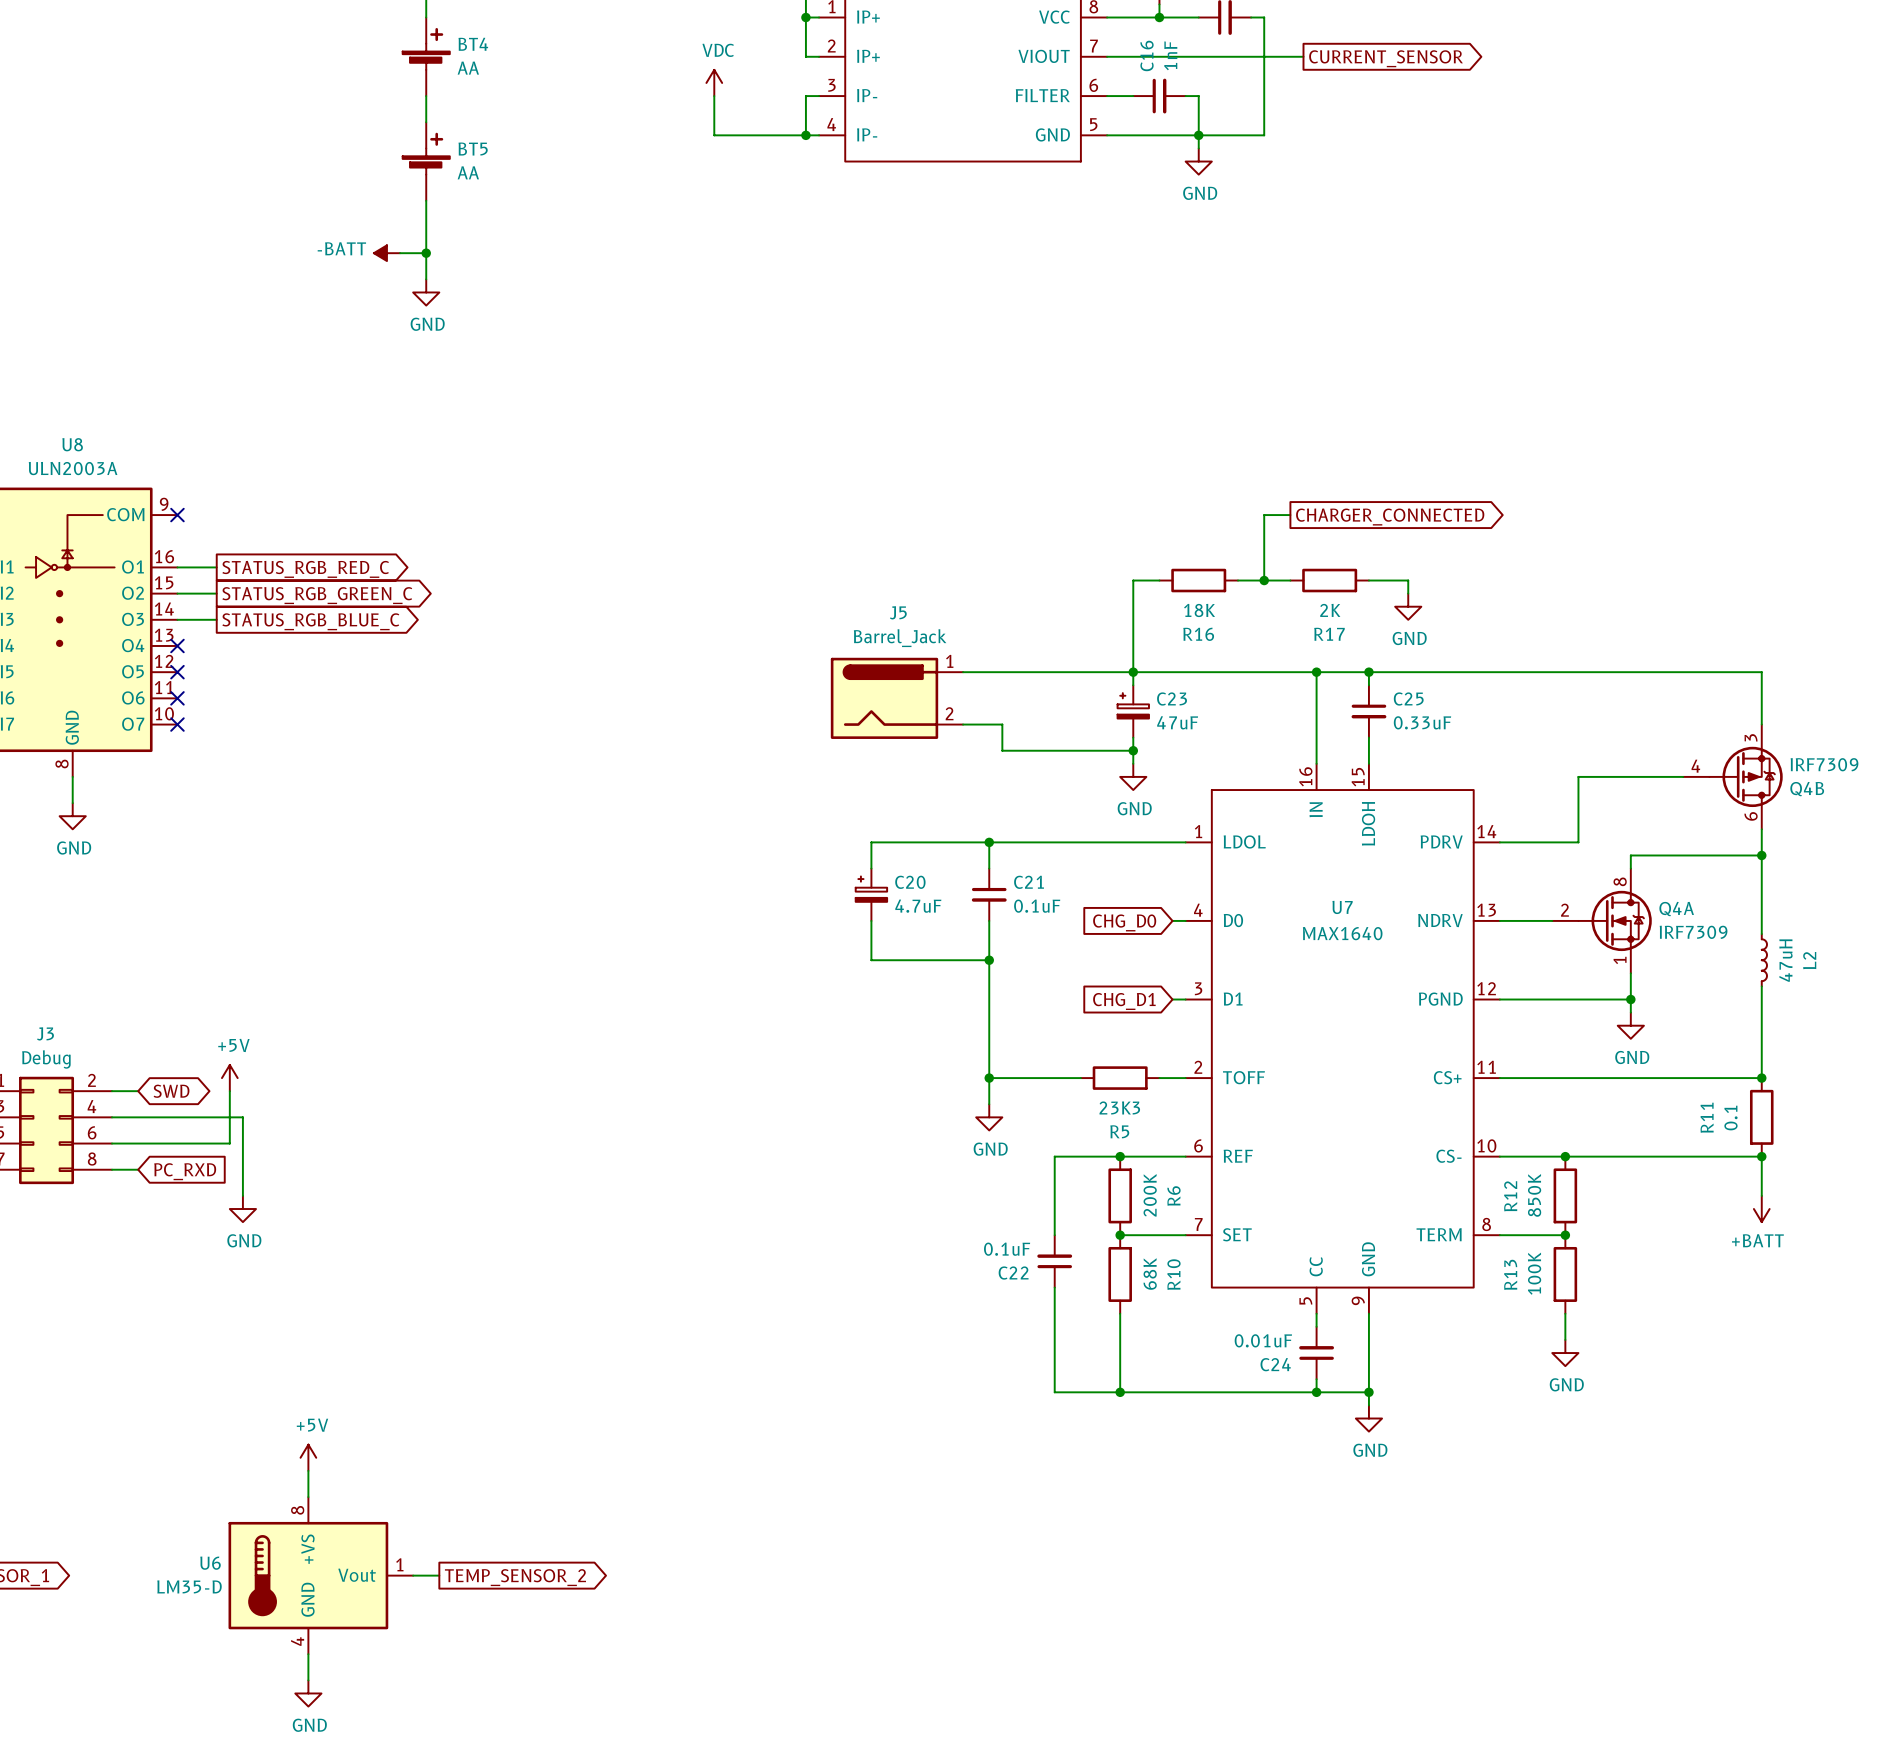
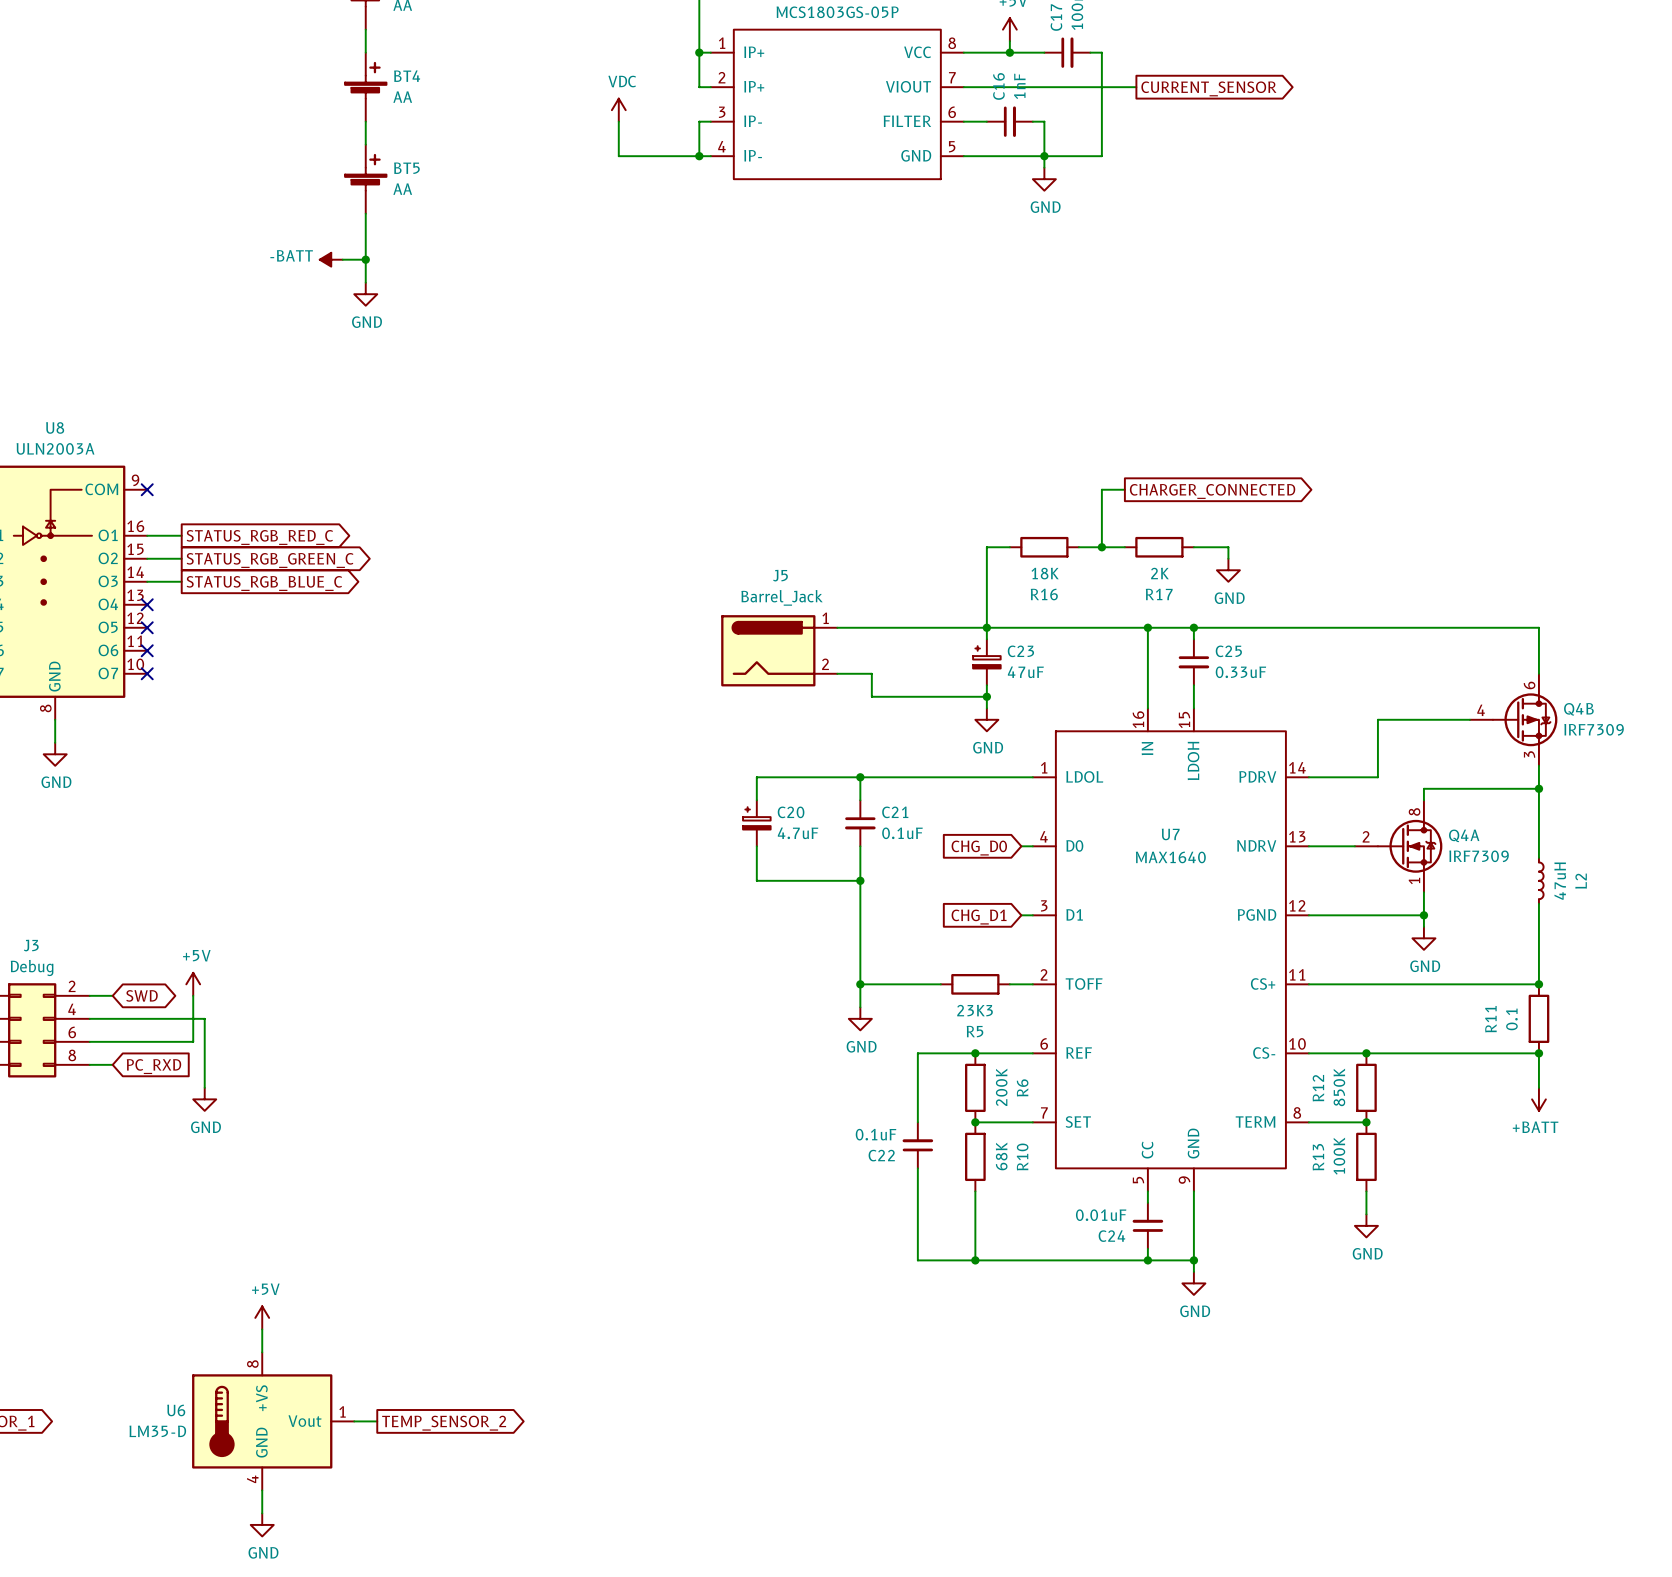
Q4B flip: as is (1746, 776) -> up-down (1525, 719)

